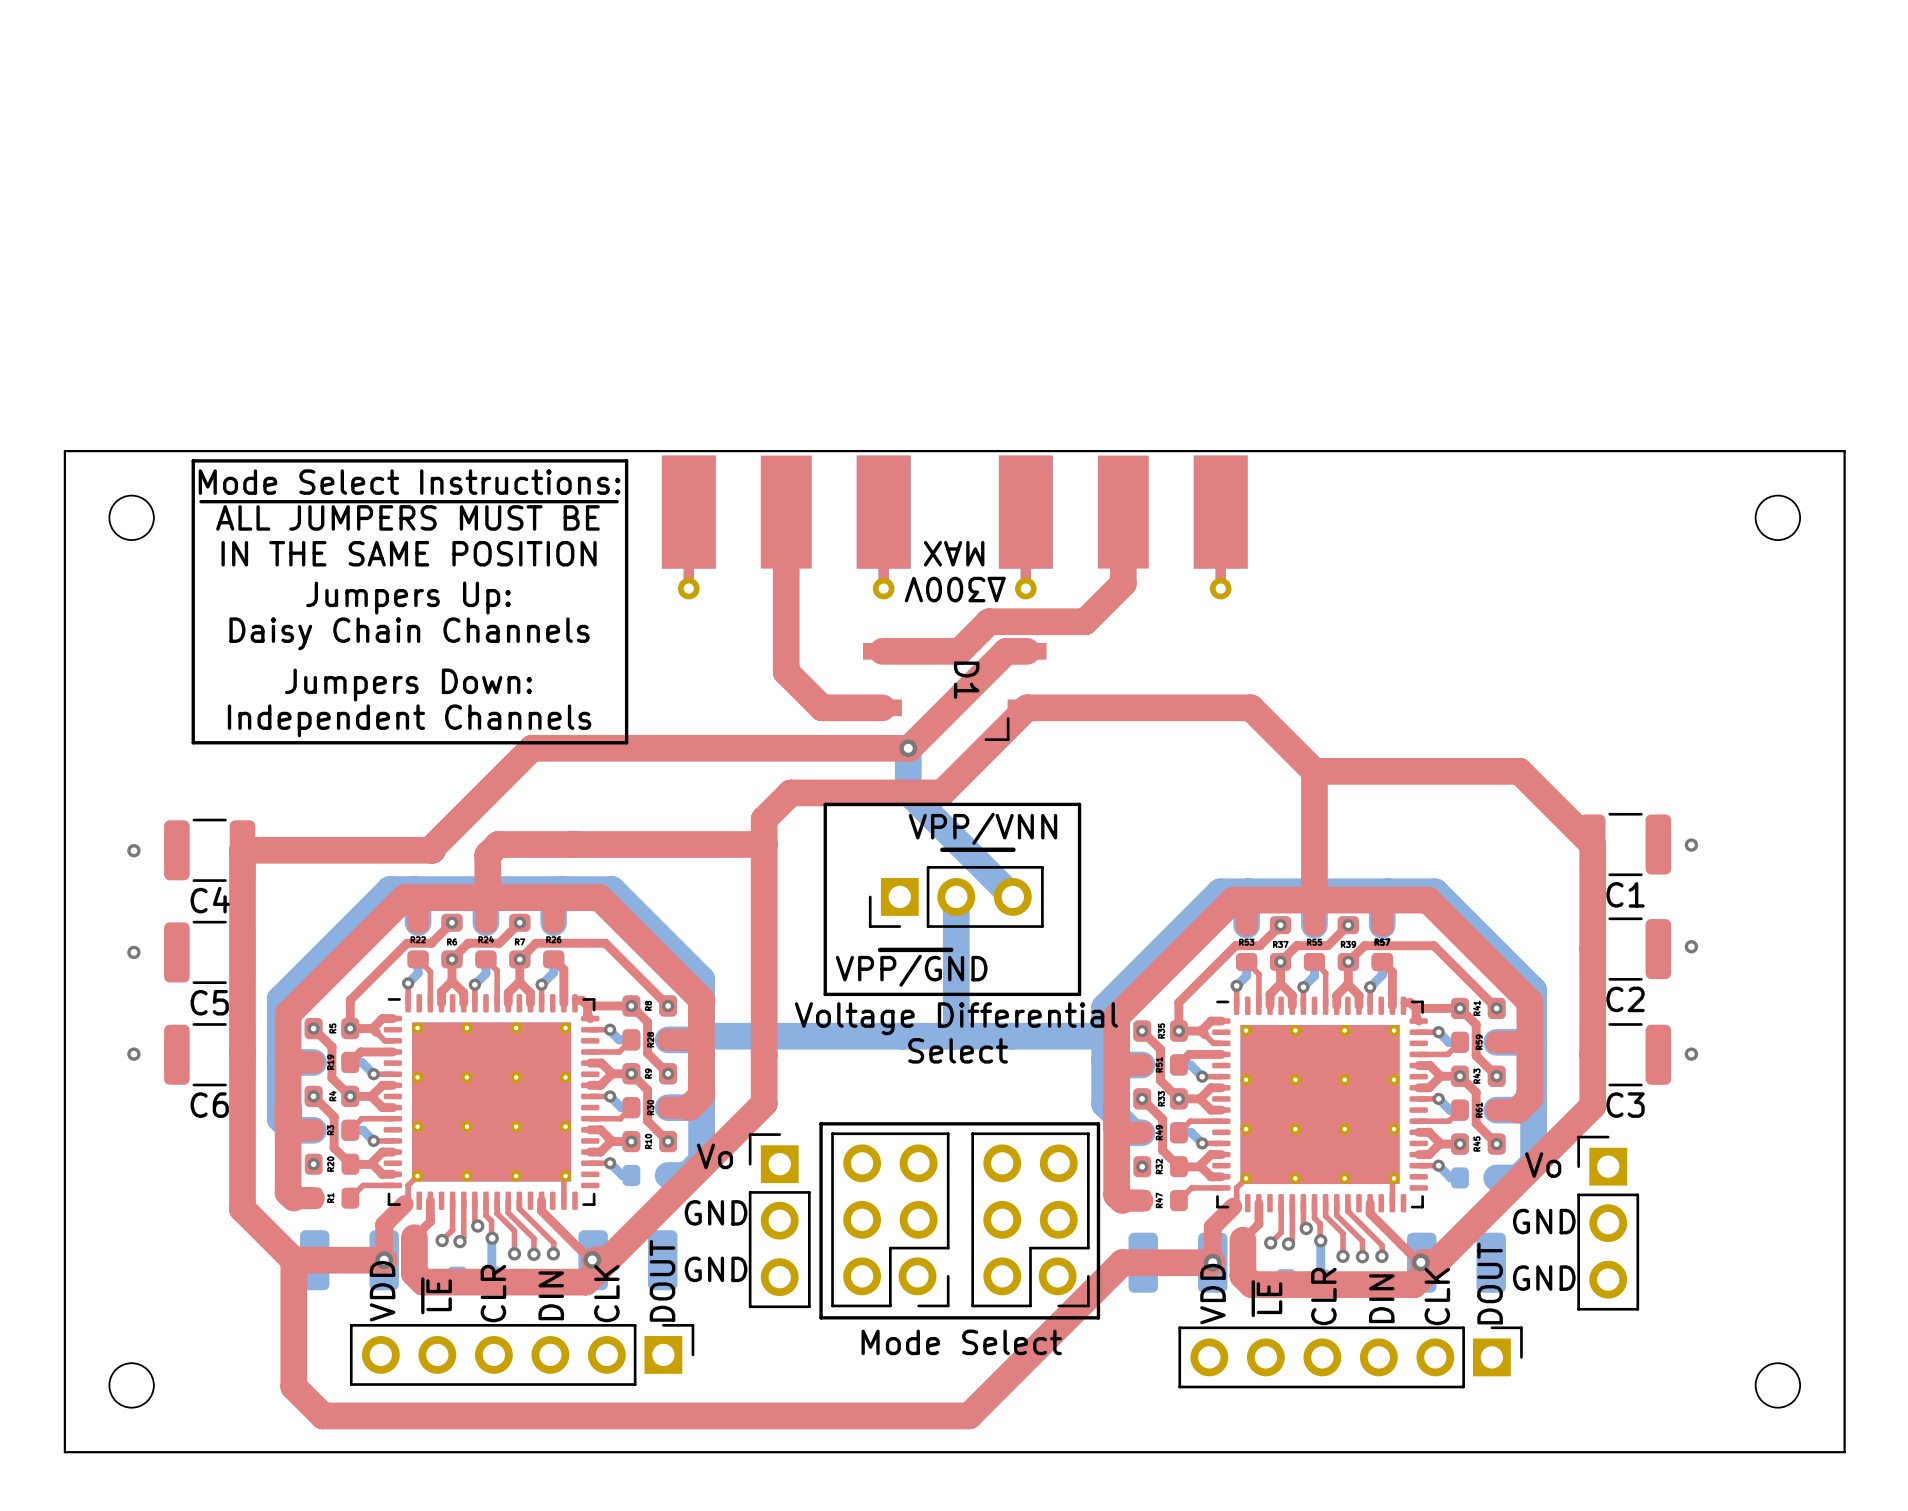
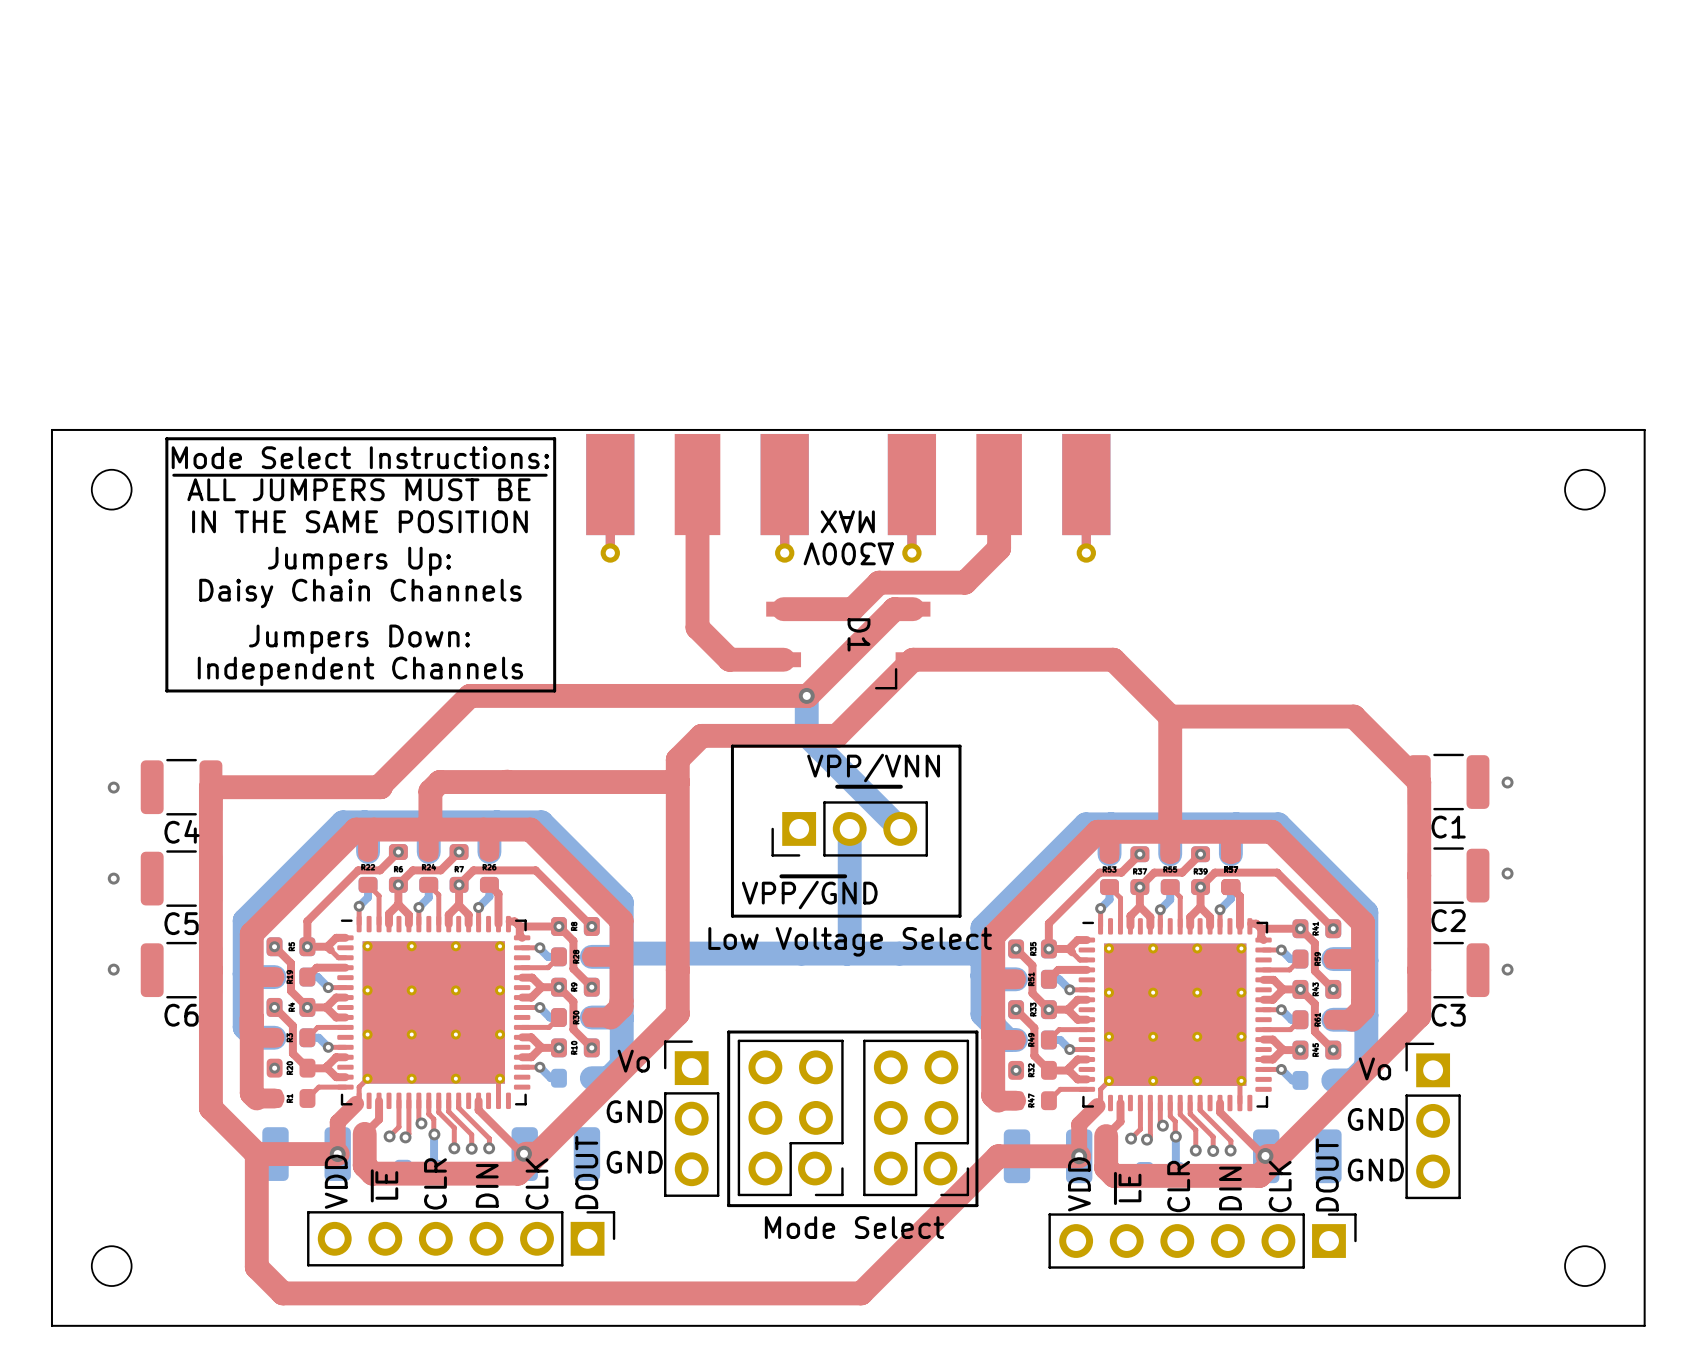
text: Voltage Differential (956, 1018) -> Low Voltage Select (850, 941)
text: Select (958, 1050) -> none

